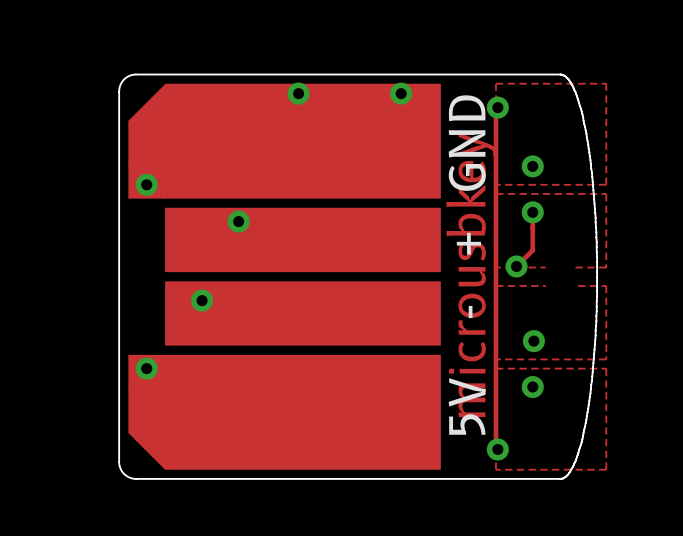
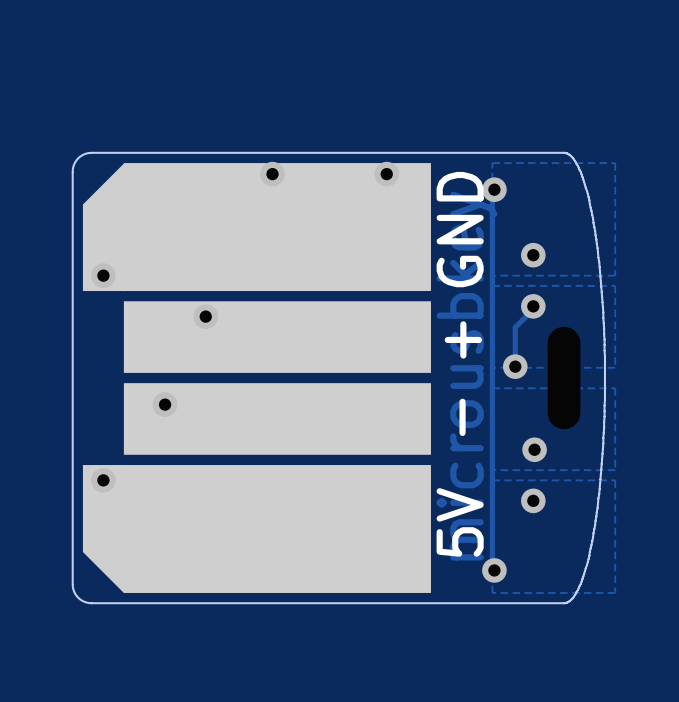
track: (532, 212) (532, 250) (516, 266) -> (535, 307) (515, 327) (515, 366)

